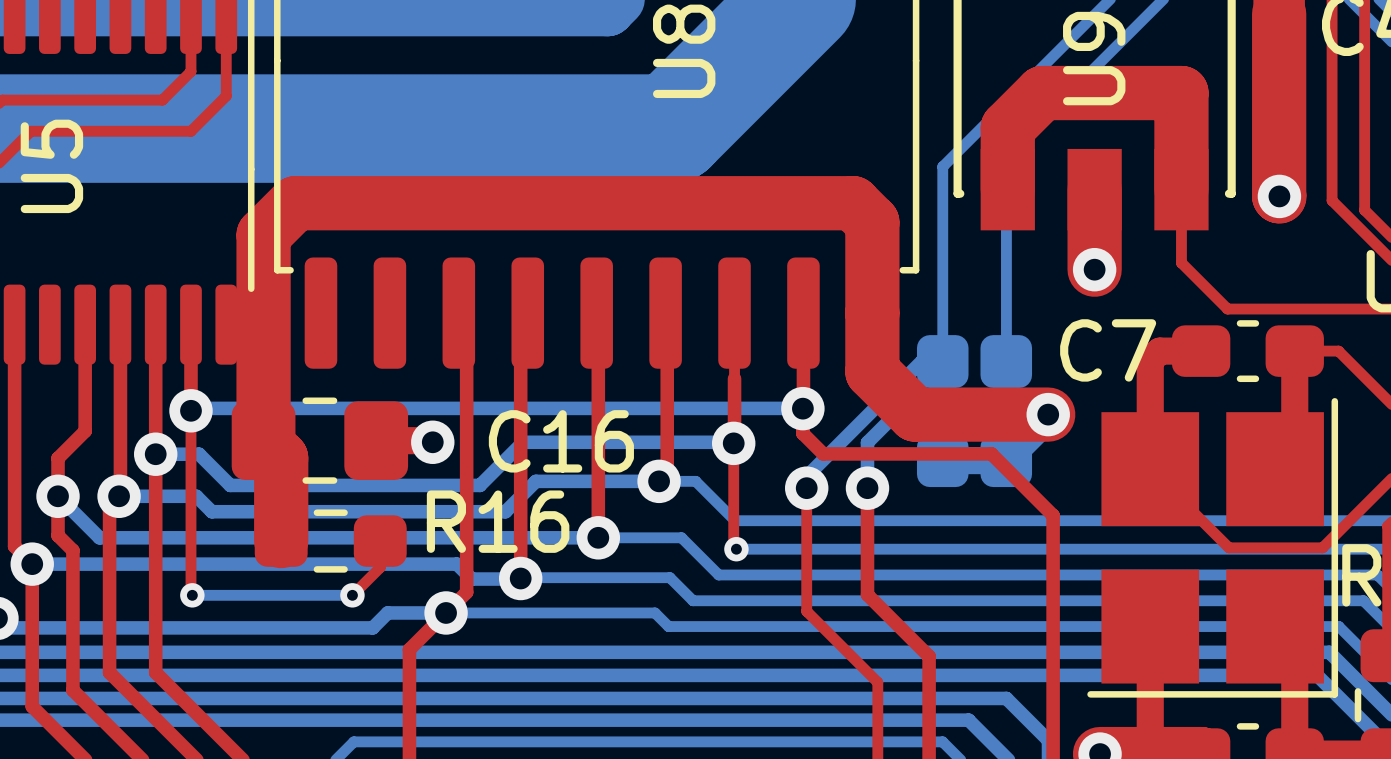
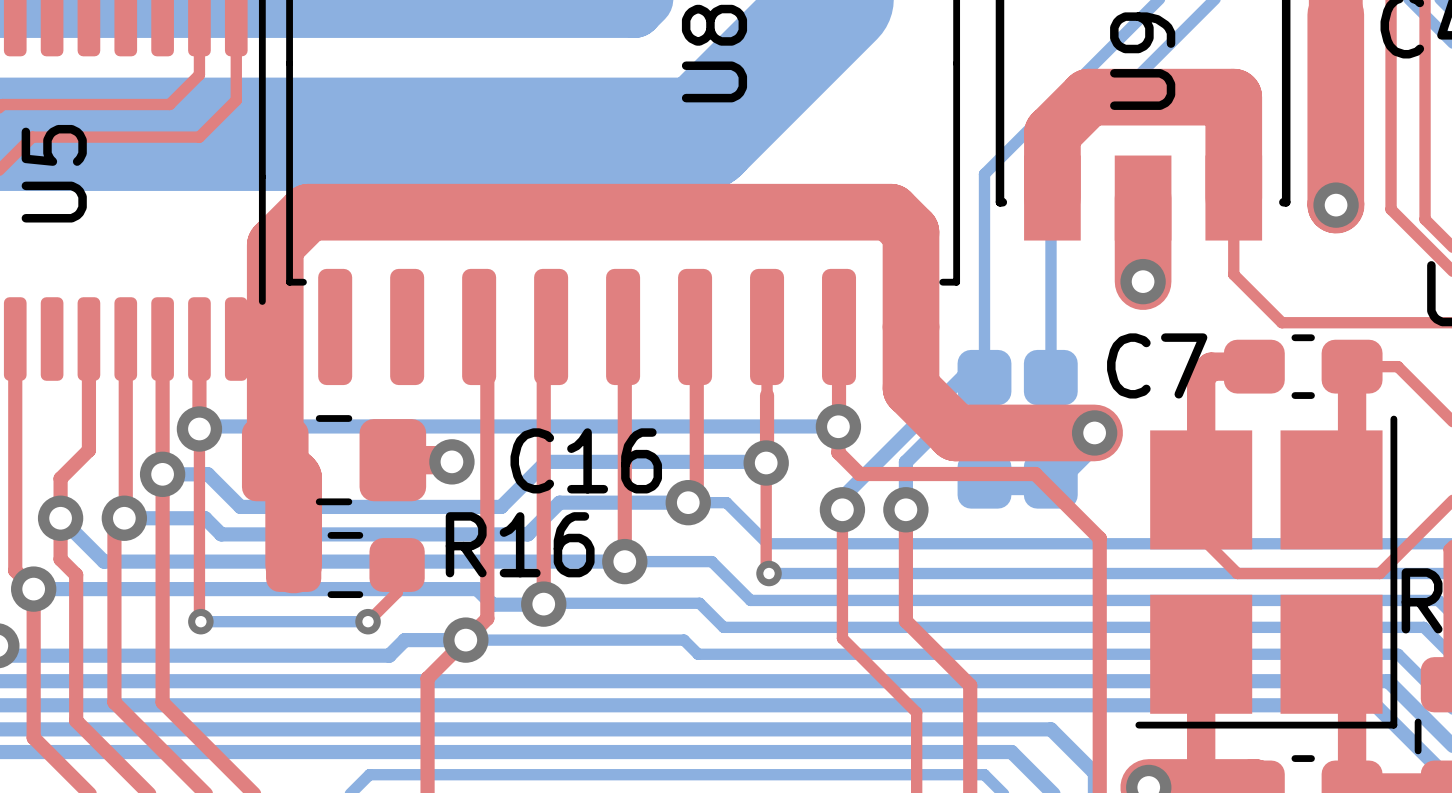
top track: (1150, 469) (1228, 547) (1322, 547) -> (1201, 489) (1201, 537) (1237, 573) (1381, 572)

